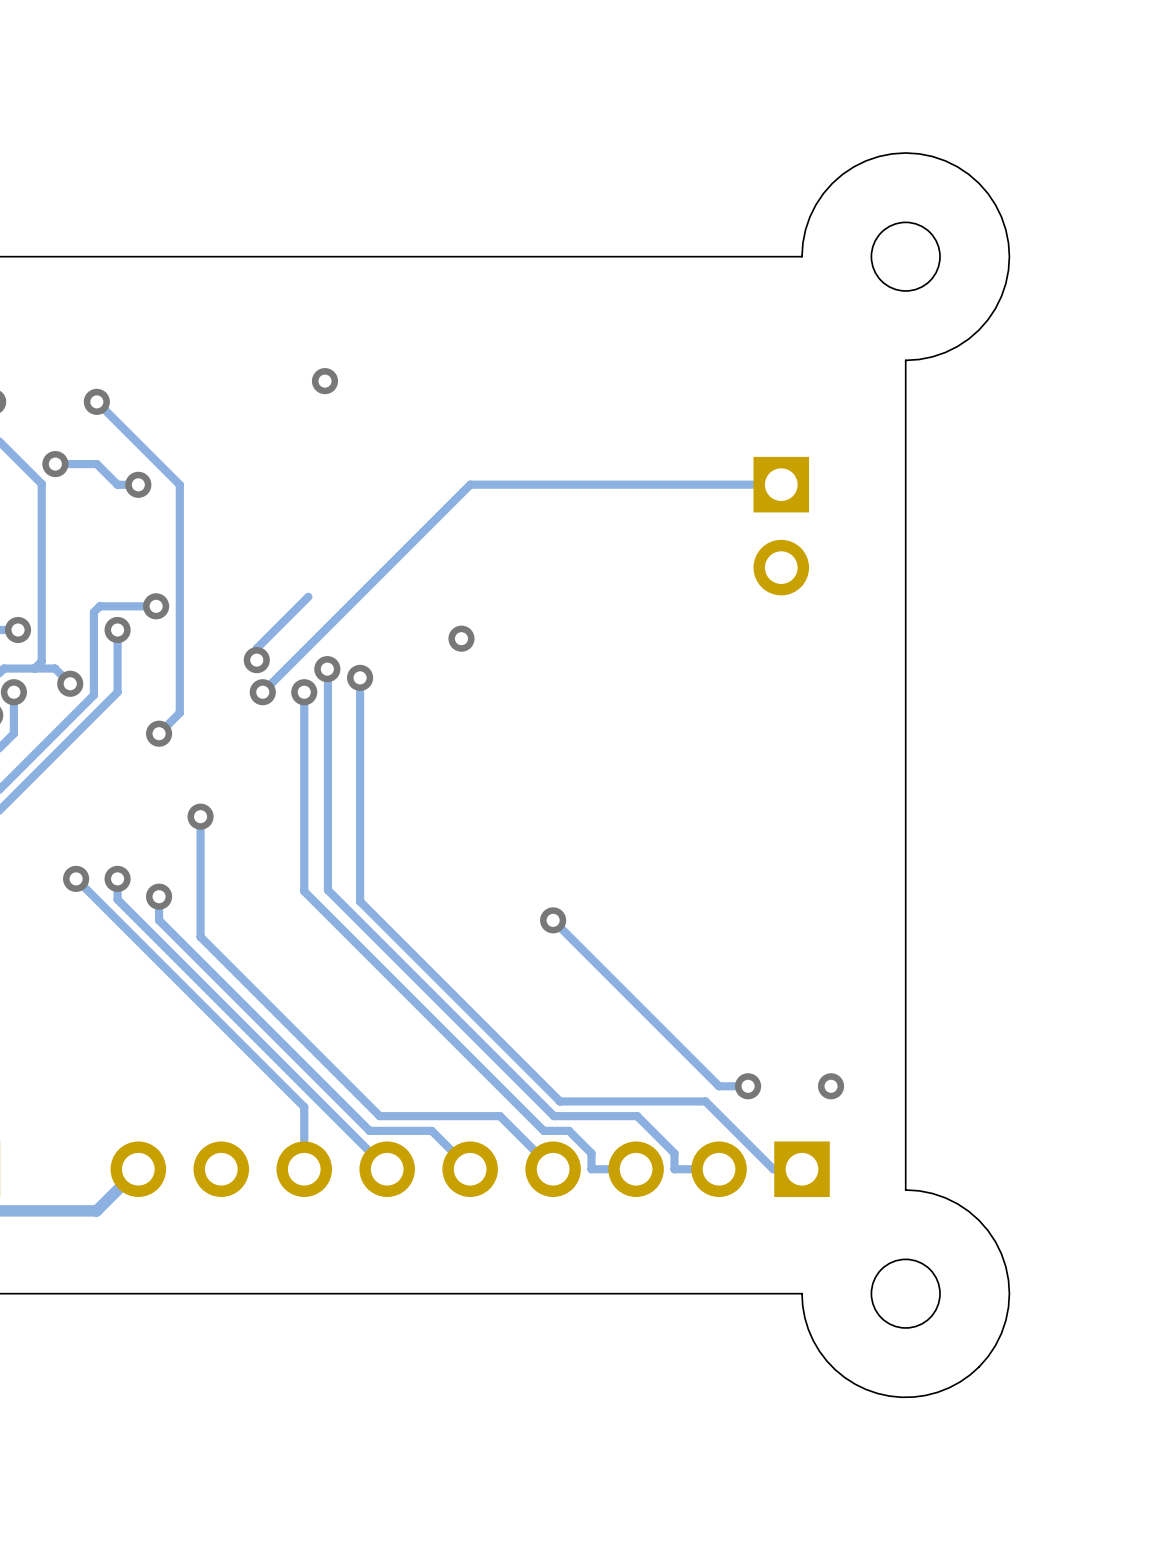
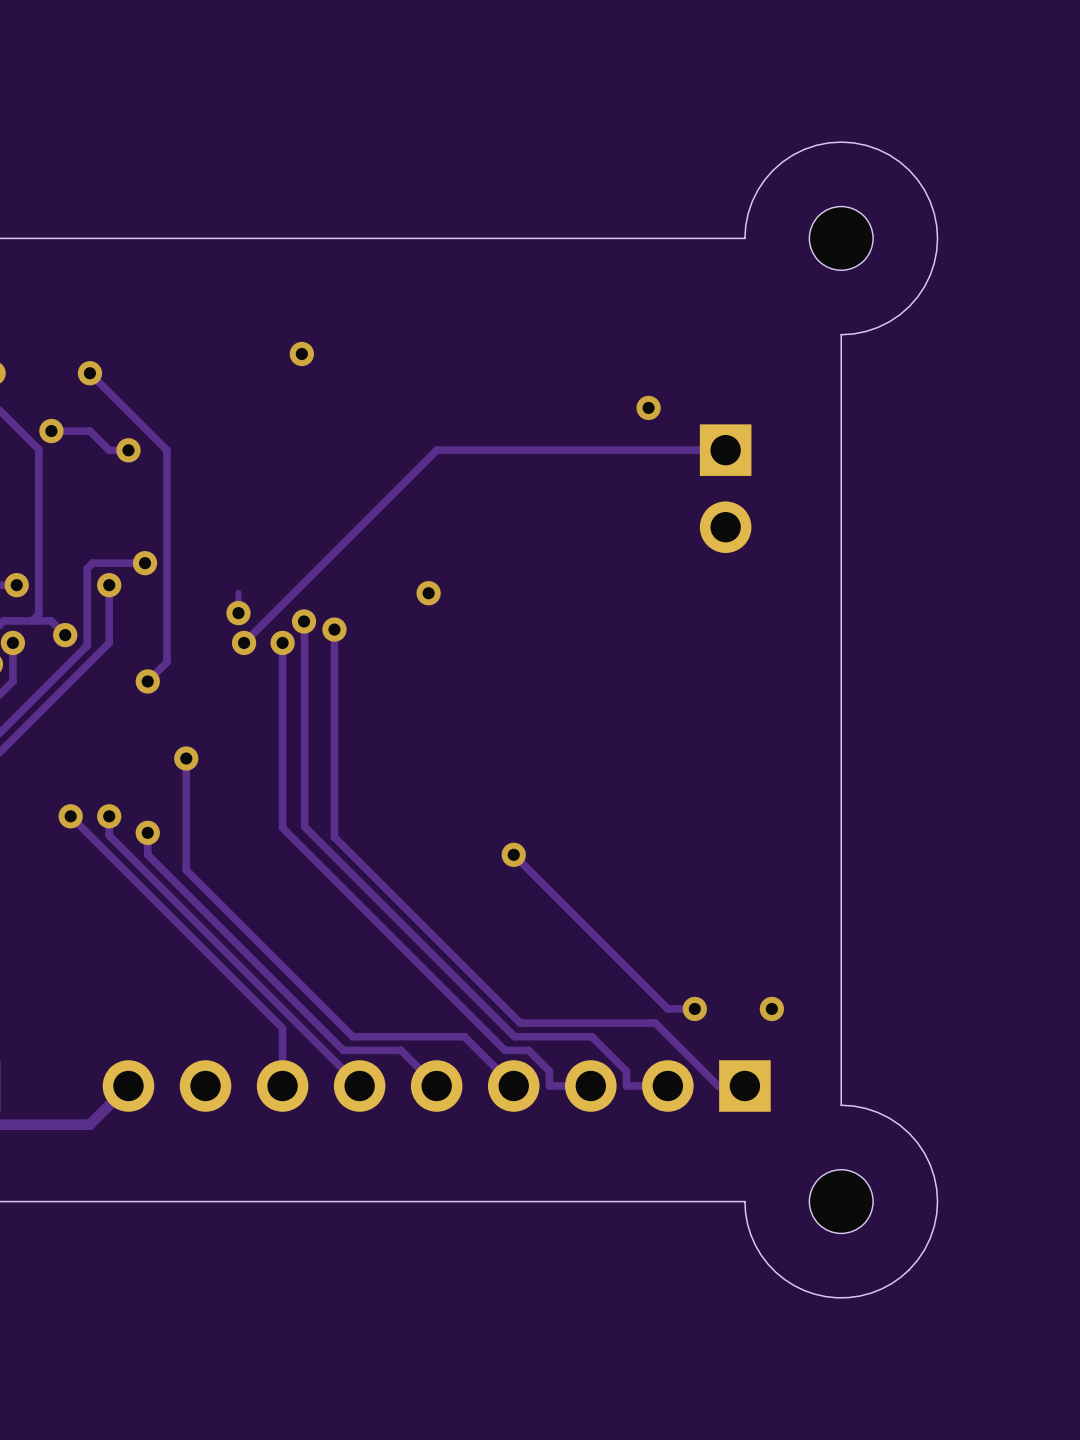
via: none -> (648, 407)
track: (308, 596) (256, 648) -> (238, 592) (238, 602)

